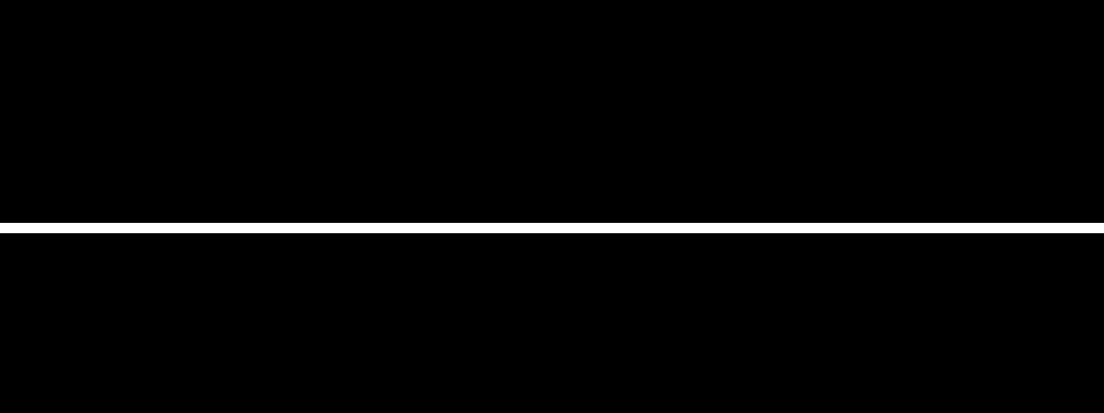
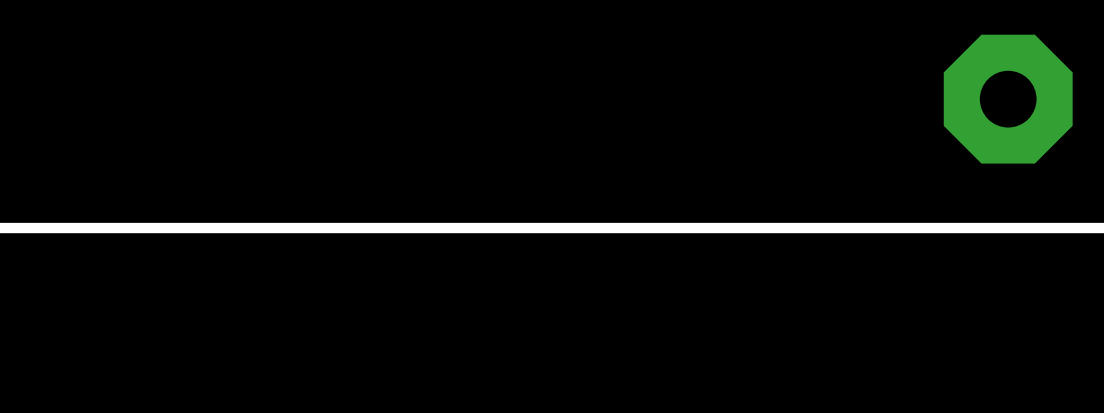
part: none -> (1008, 99)

